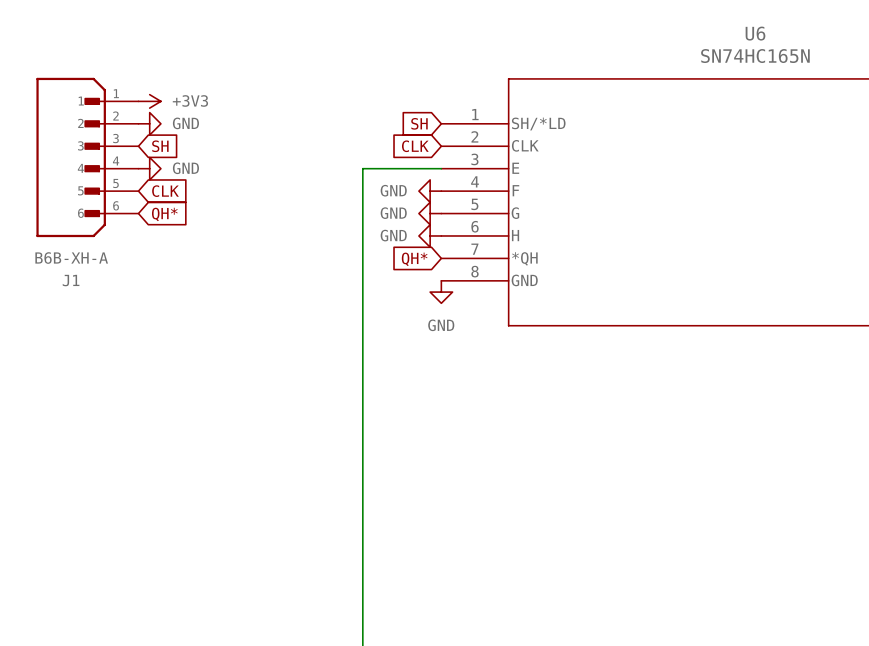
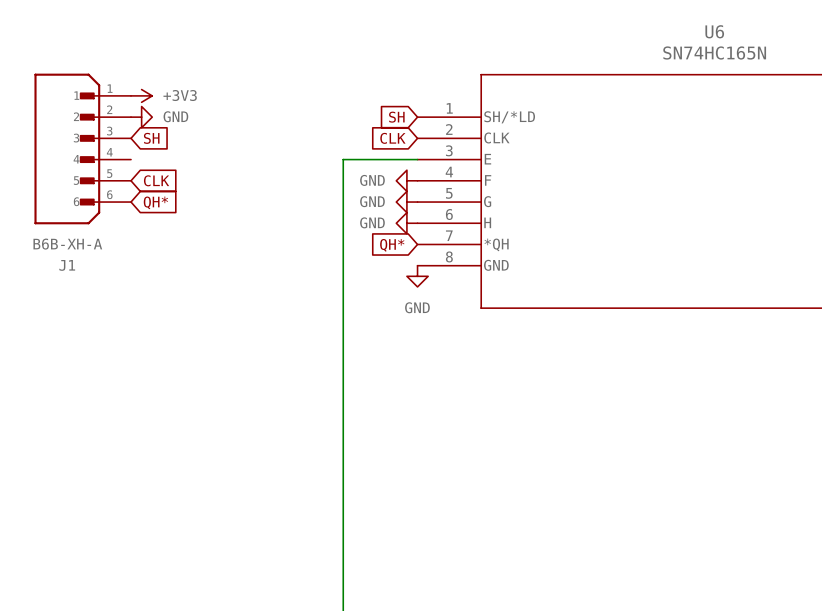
power symbol: GND (149, 168) -> none

